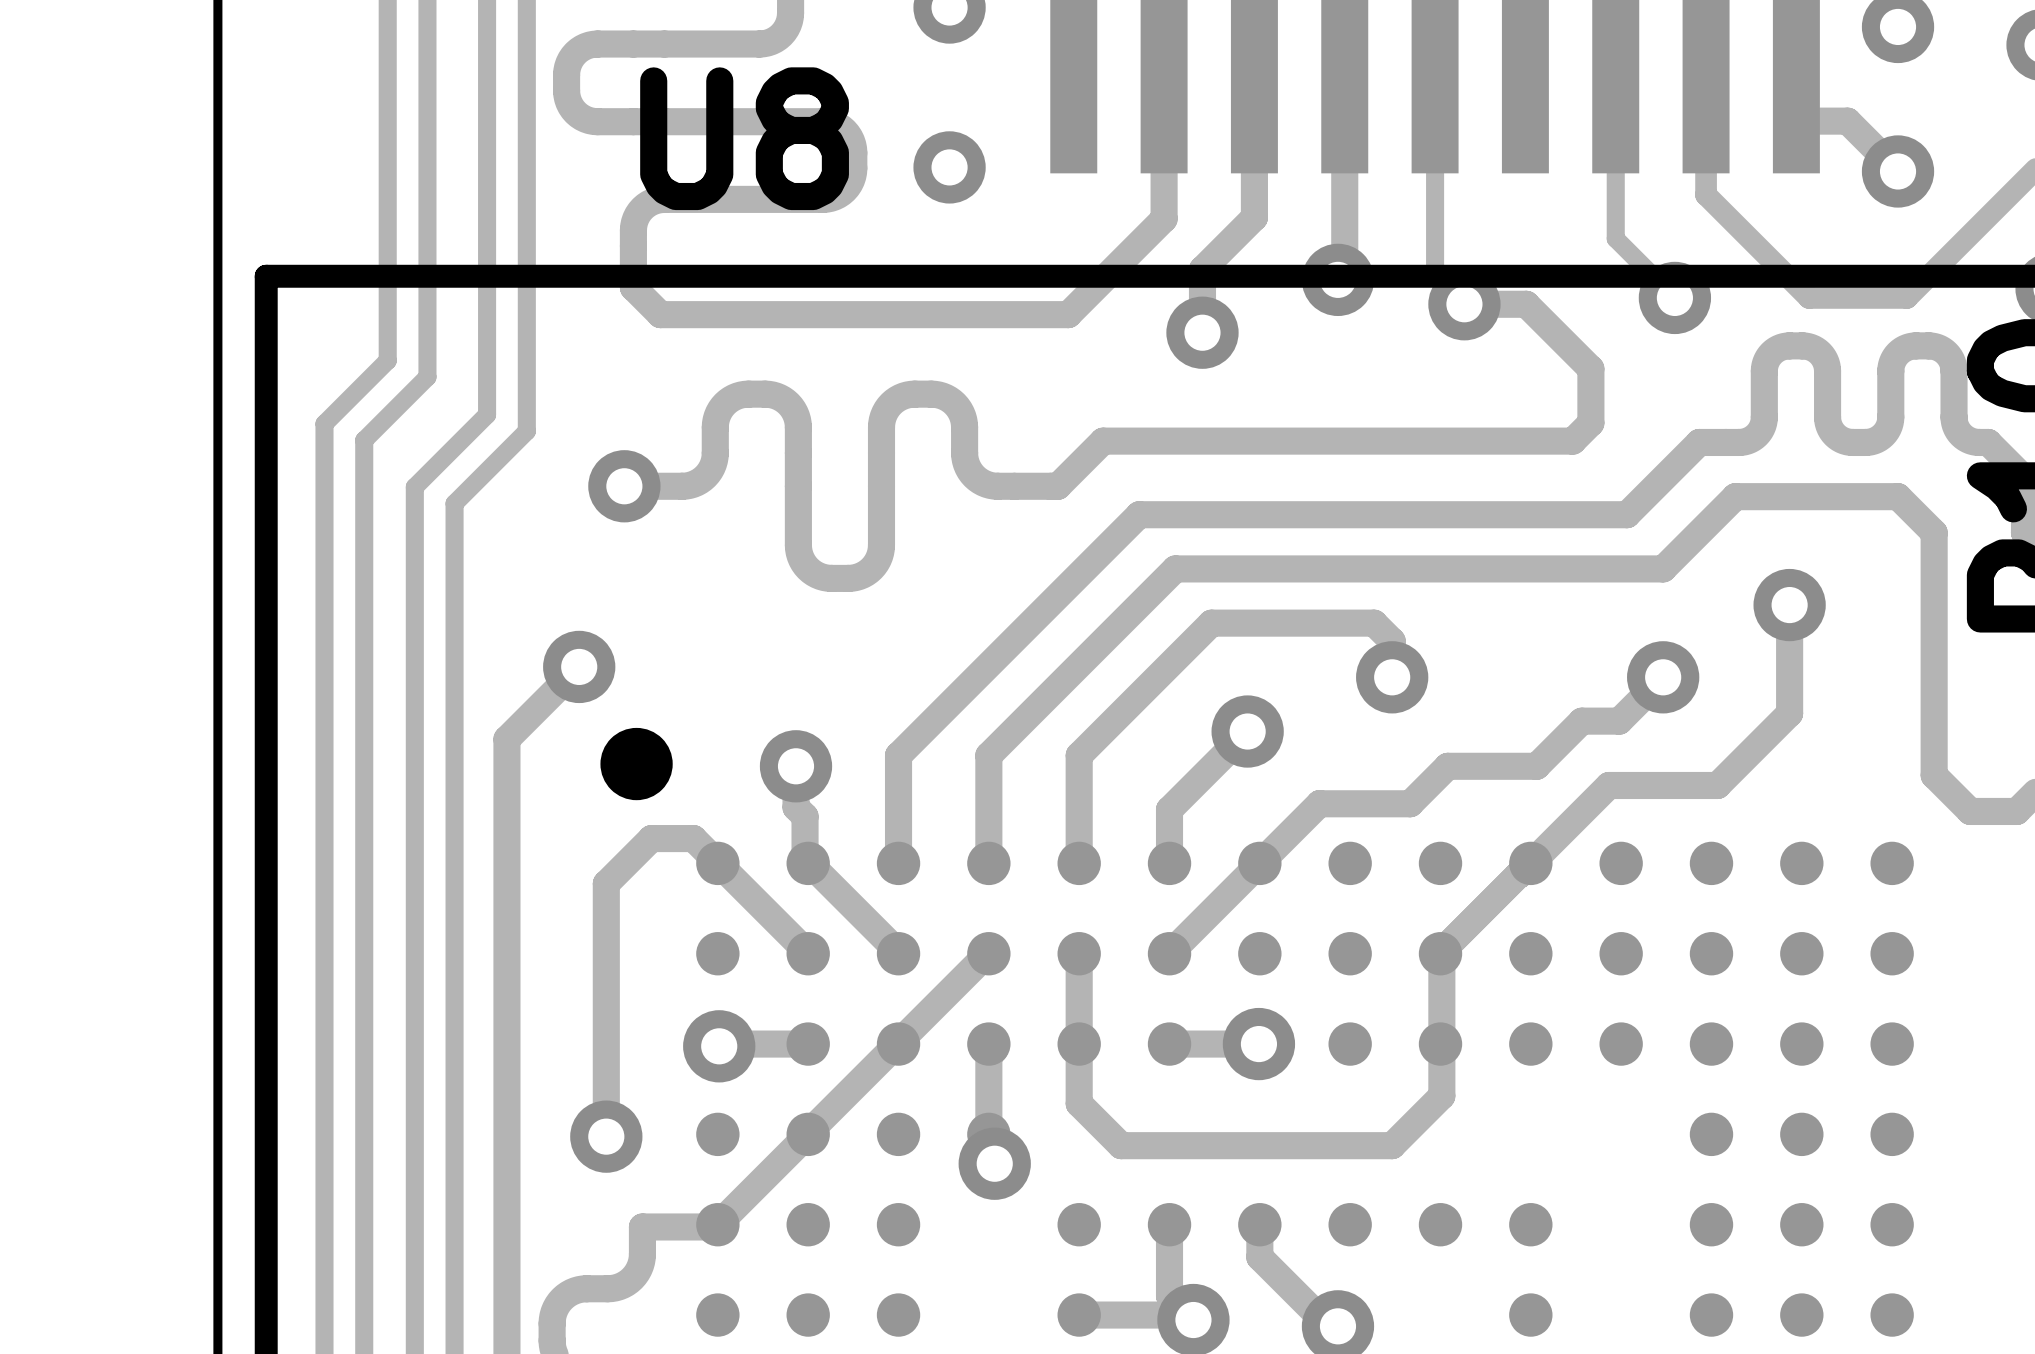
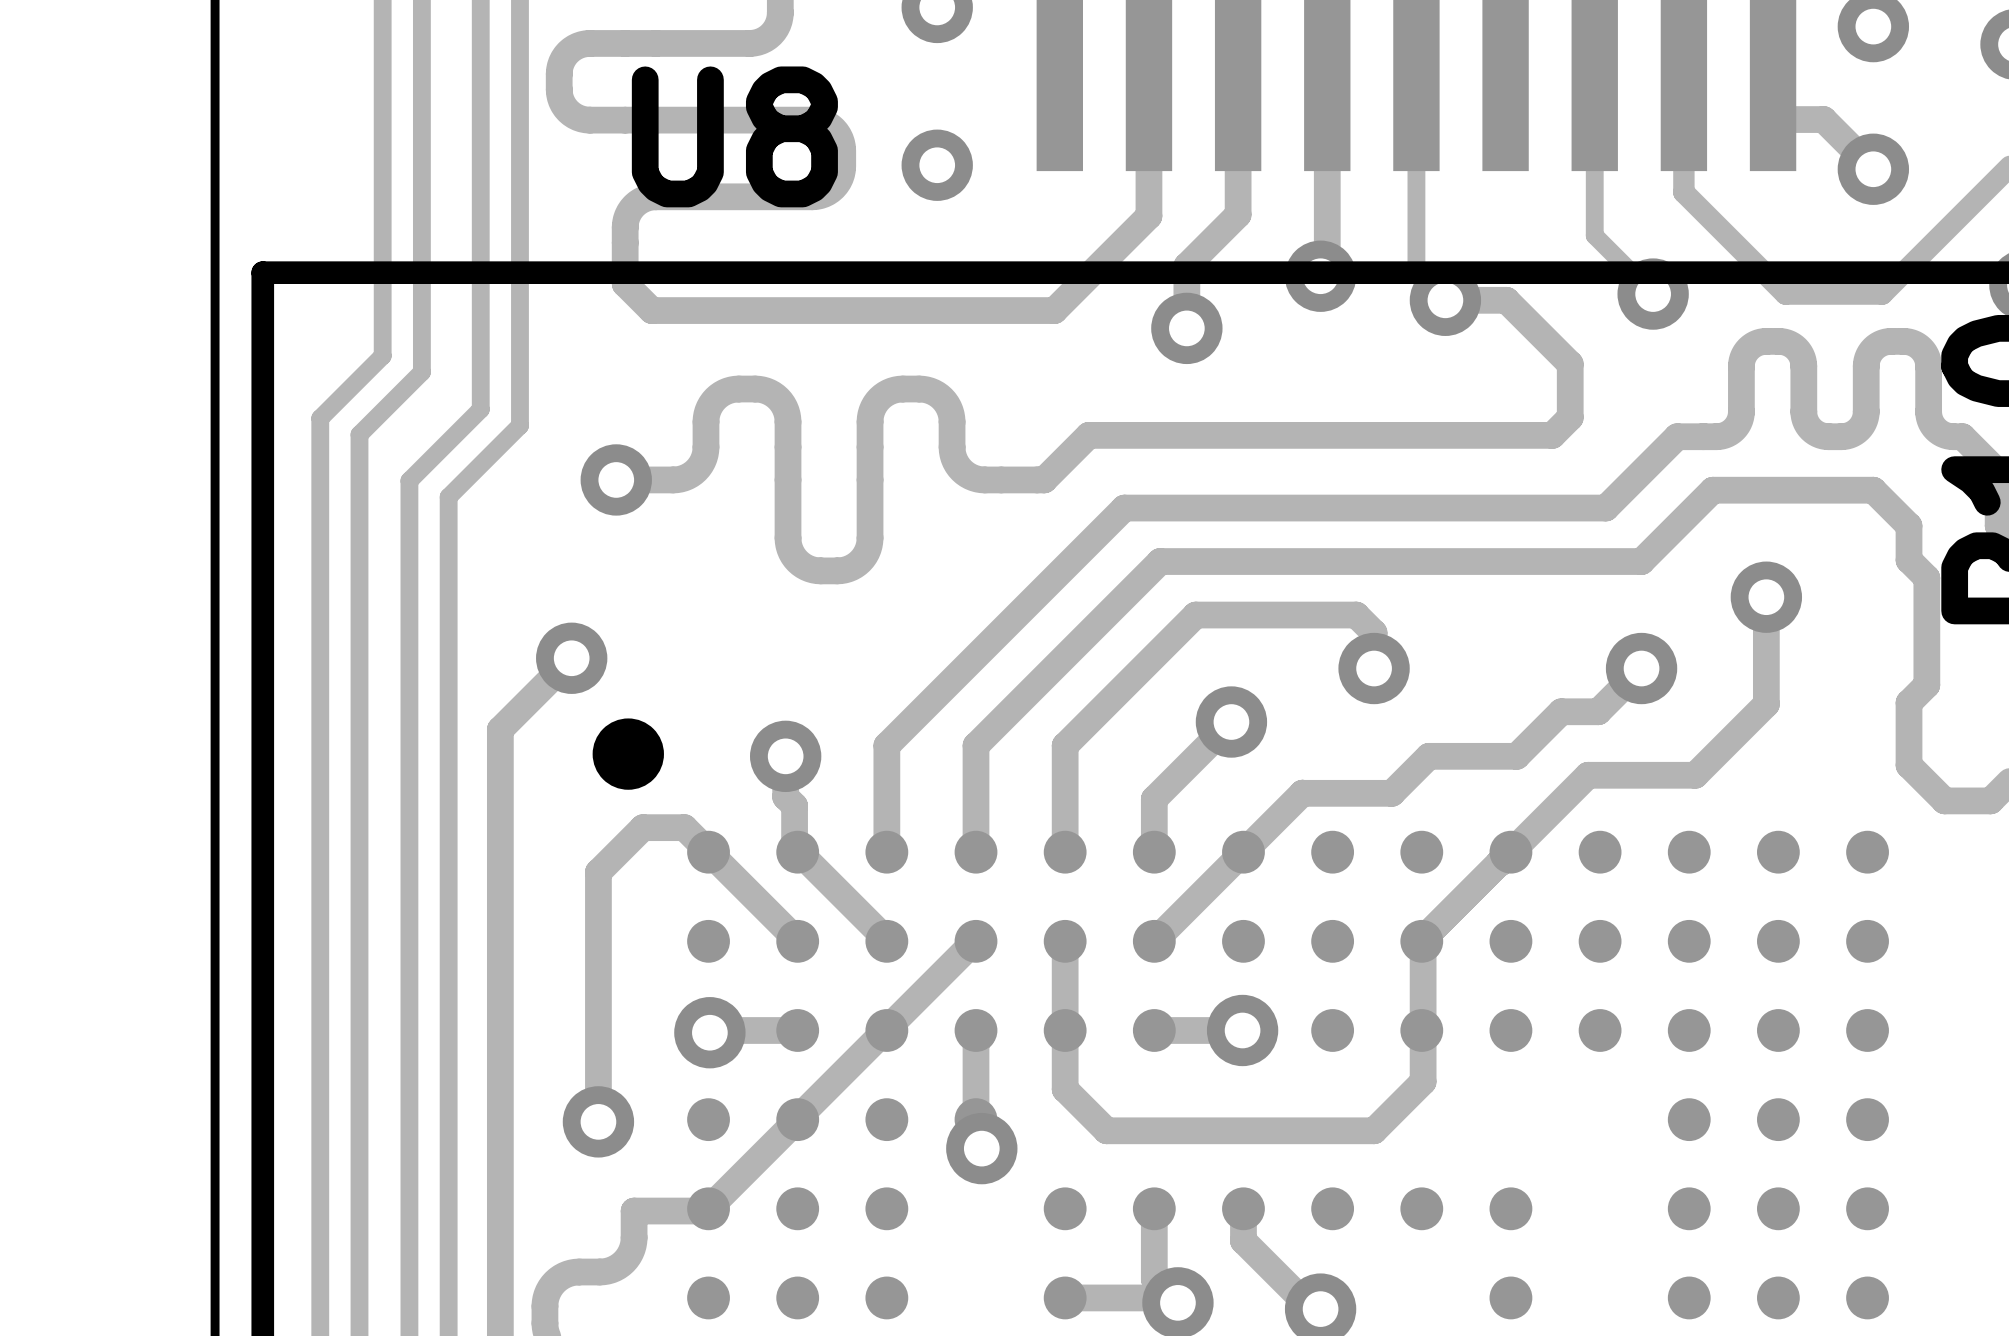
track: (1934, 567) (1934, 712) -> (1909, 560) (1926, 578) (1926, 685) (1909, 702)

